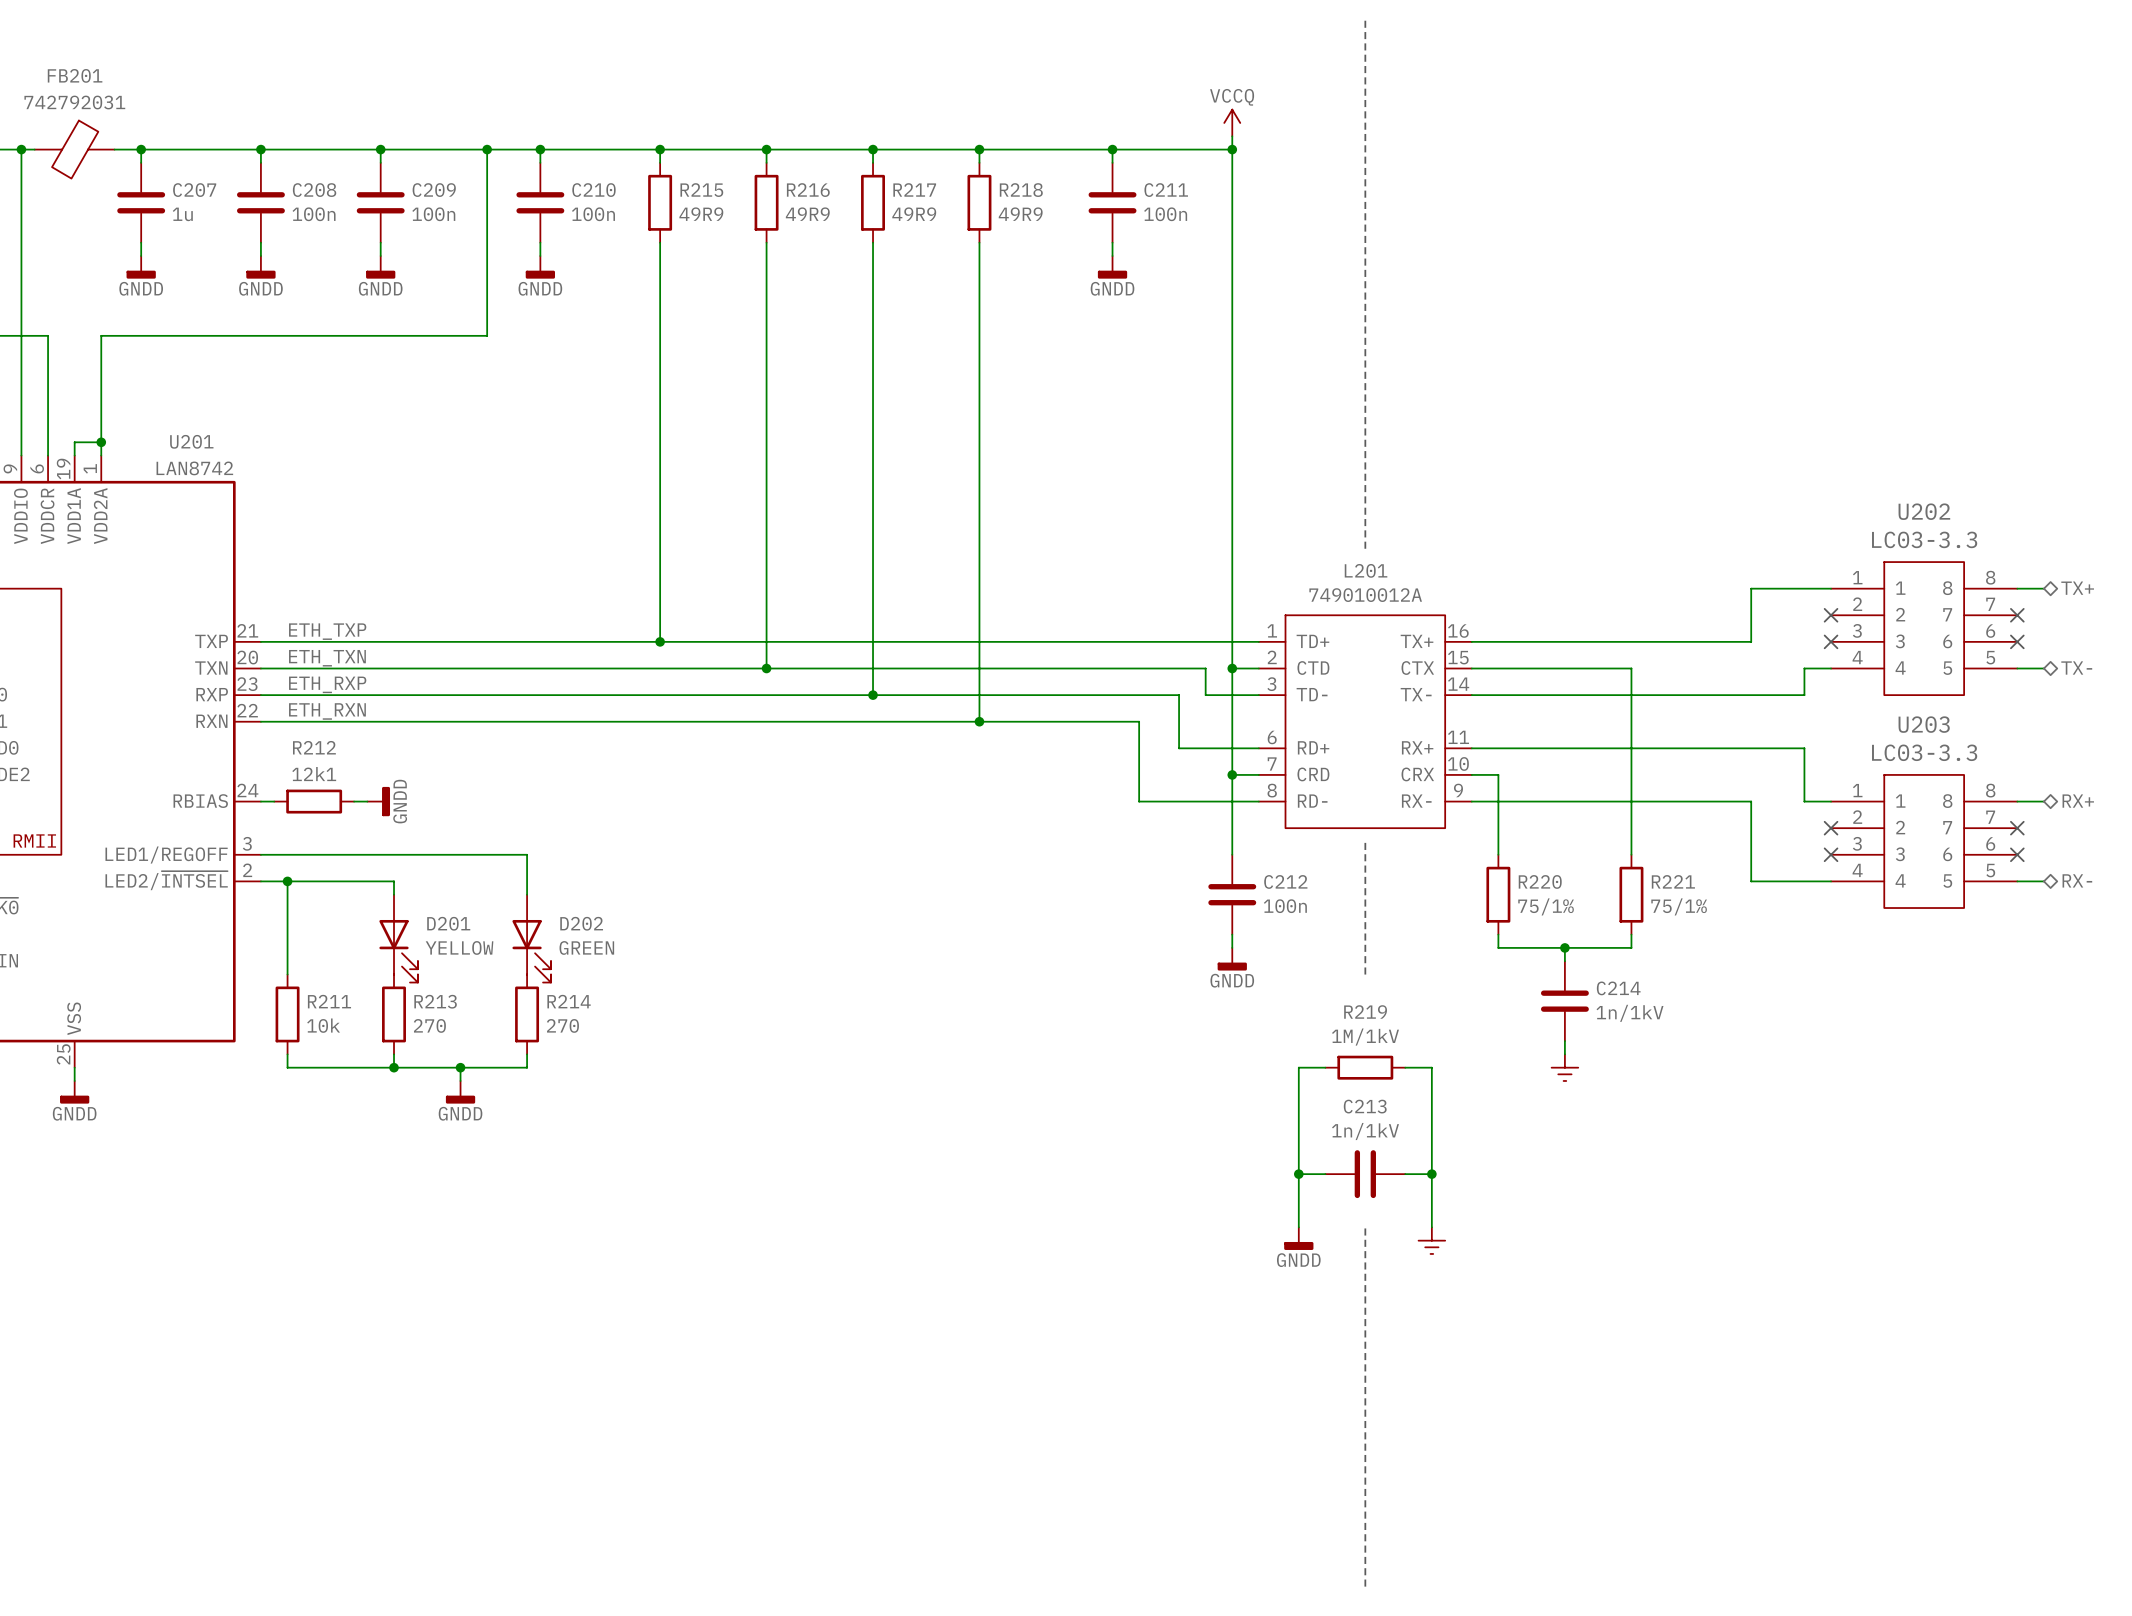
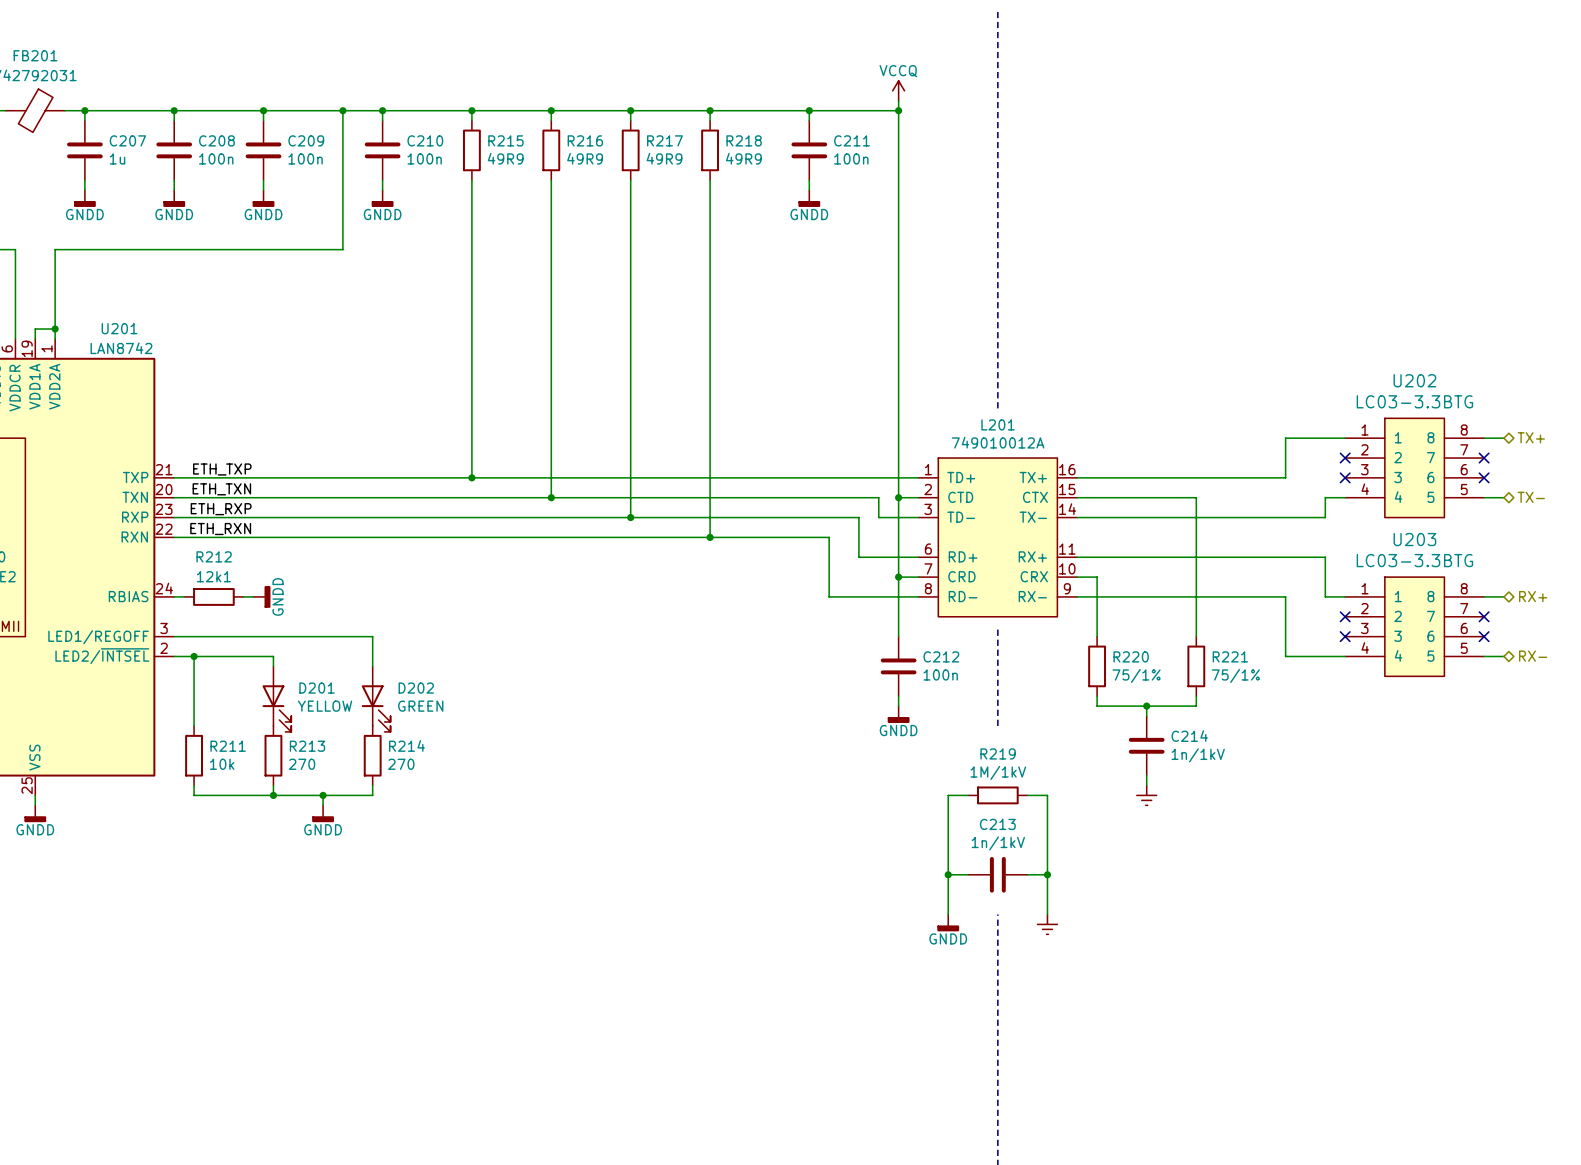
U202 value: LC03-3.3 (1924, 539) -> LC03-3.3BTG (1414, 401)
U203 value: LC03-3.3 (1924, 752) -> LC03-3.3BTG (1414, 560)

